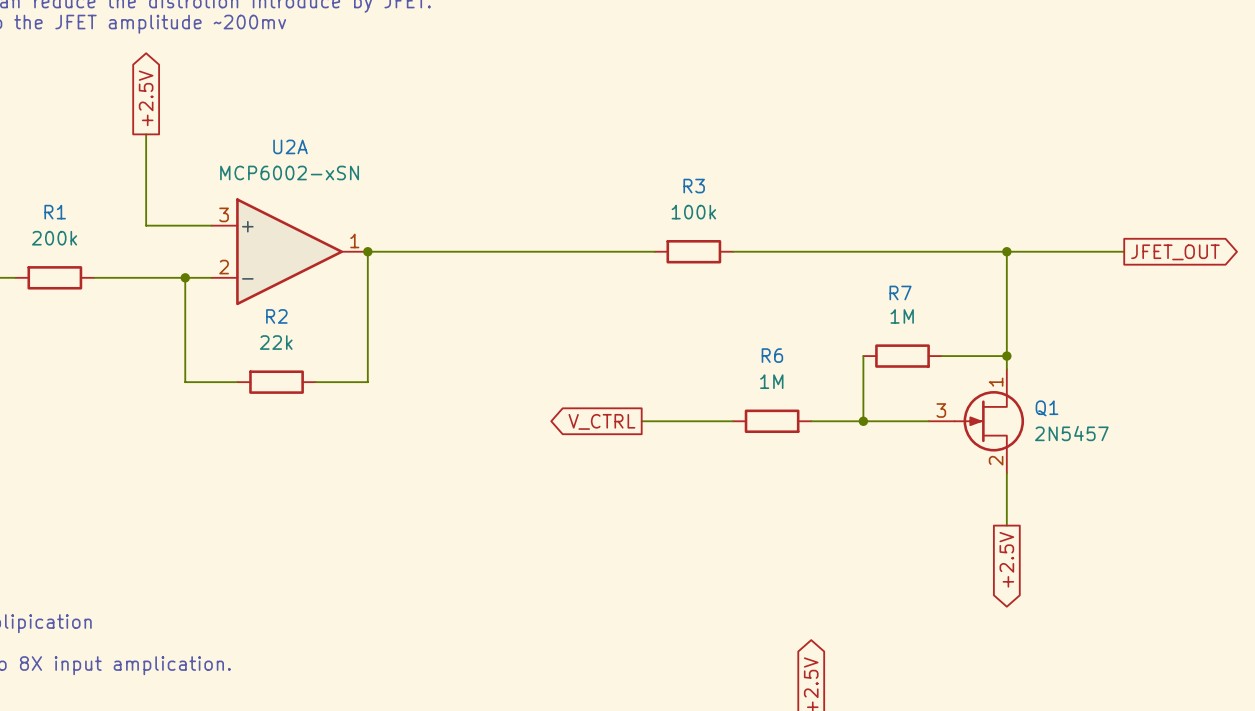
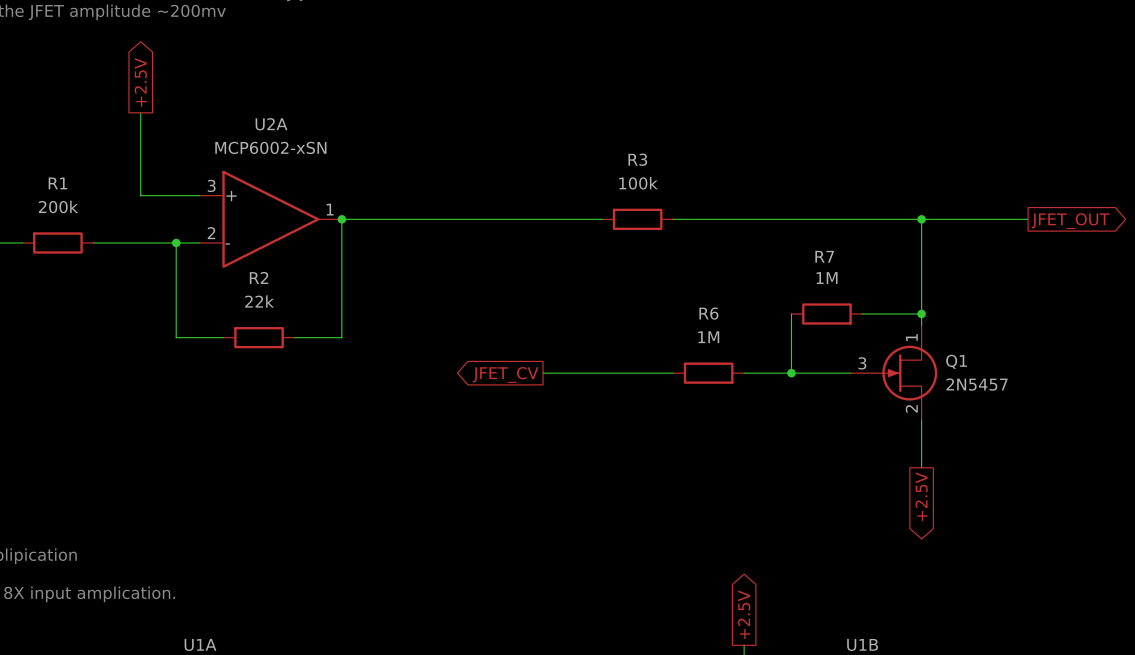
global label: none -> JFET_CV (505, 374)
wire: none -> (542, 373) (590, 373)
global label: V_CTRL (601, 421) -> none

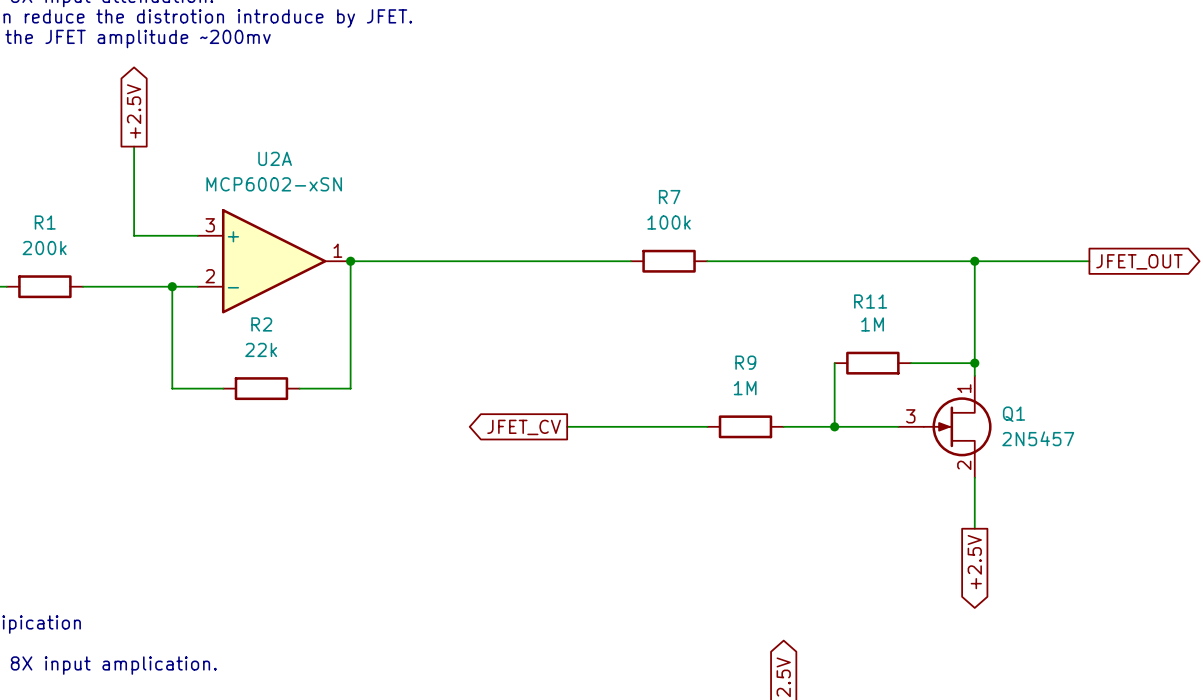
R3 name: R3 (637, 159) -> R7 (669, 197)
R7 name: R7 (824, 256) -> R11 (870, 301)
R6 name: R6 (708, 313) -> R9 (745, 362)

